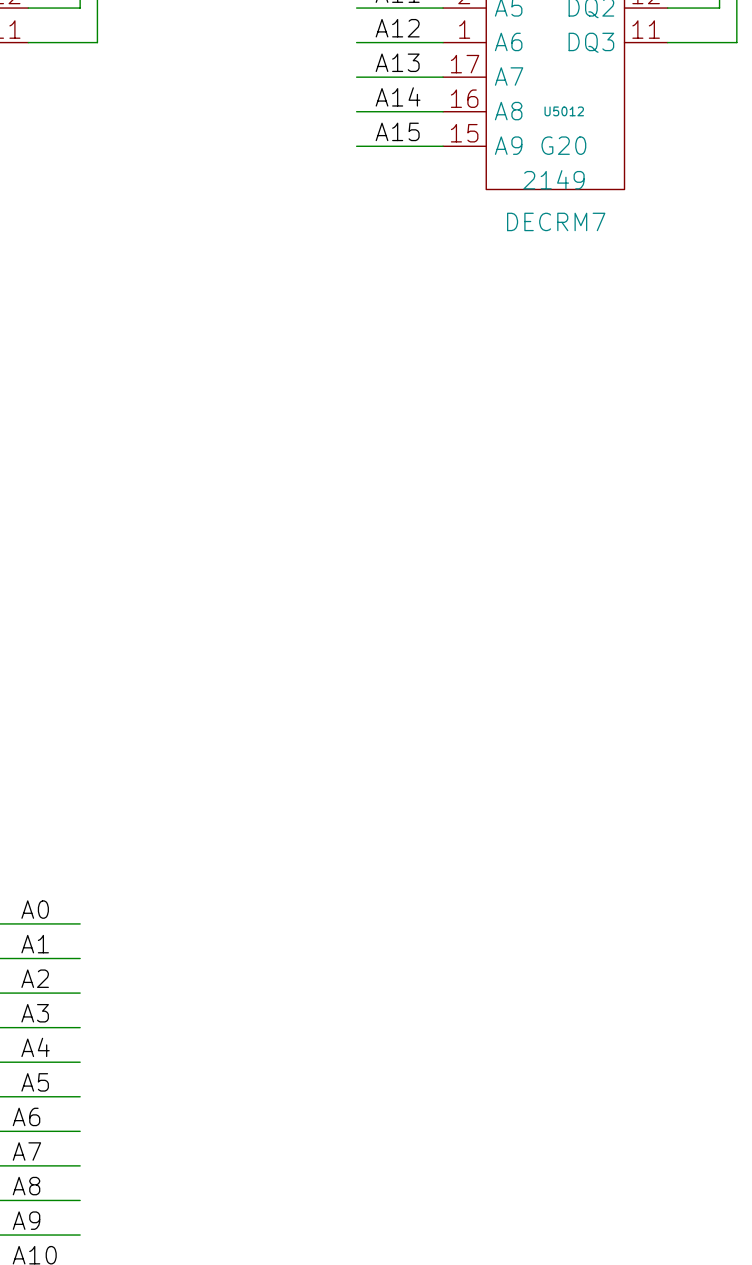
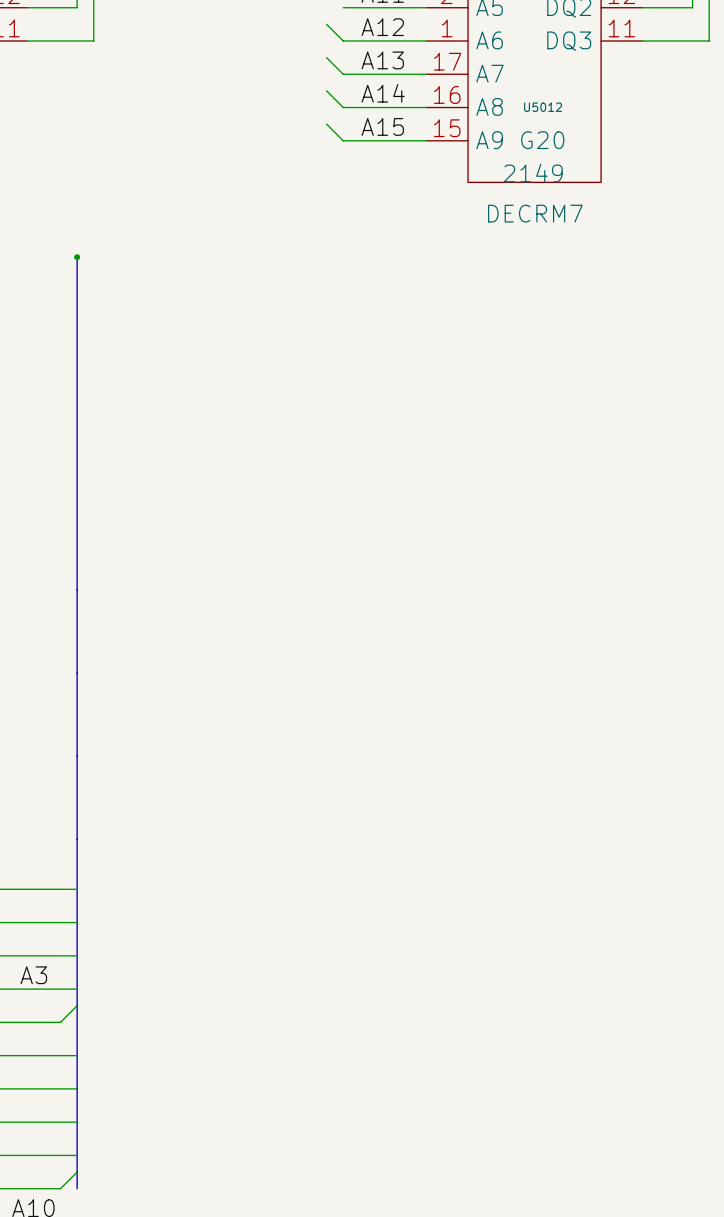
wire: none -> (326, 24) (343, 41)
wire: none -> (326, 57) (343, 74)
wire: none -> (326, 90) (343, 107)
wire: none -> (326, 124) (343, 140)
bus: none -> (77, 257) (77, 1188)
junction: none -> (77, 257)
label: A0 (35, 909) -> none
label: A1 (35, 944) -> none
label: A2 (35, 978) -> none
label: A4 (35, 1047) -> none
wire: (62, 1062) (80, 1062) -> (60, 1022) (77, 1005)
label: A5 (35, 1082) -> none
label: A6 (26, 1116) -> none
label: A7 (26, 1151) -> none
label: A8 (26, 1186) -> none
label: A9 (26, 1220) -> none
wire: (62, 1235) (80, 1235) -> (60, 1188) (77, 1172)

